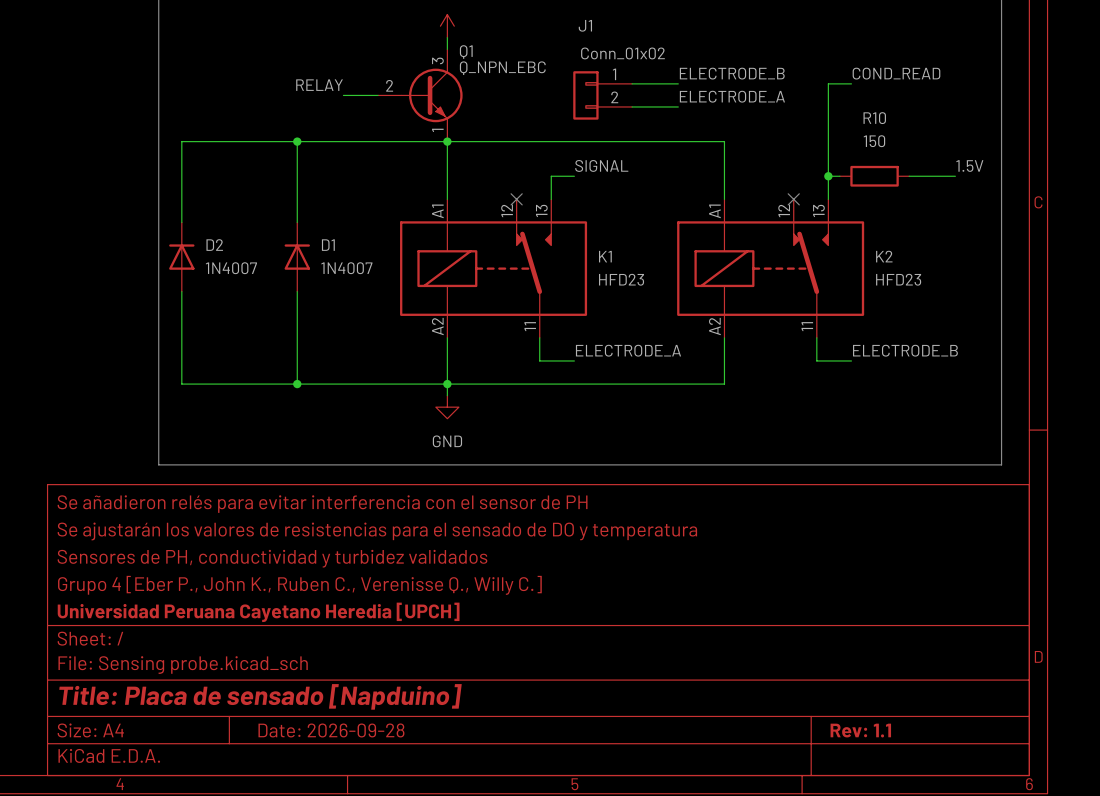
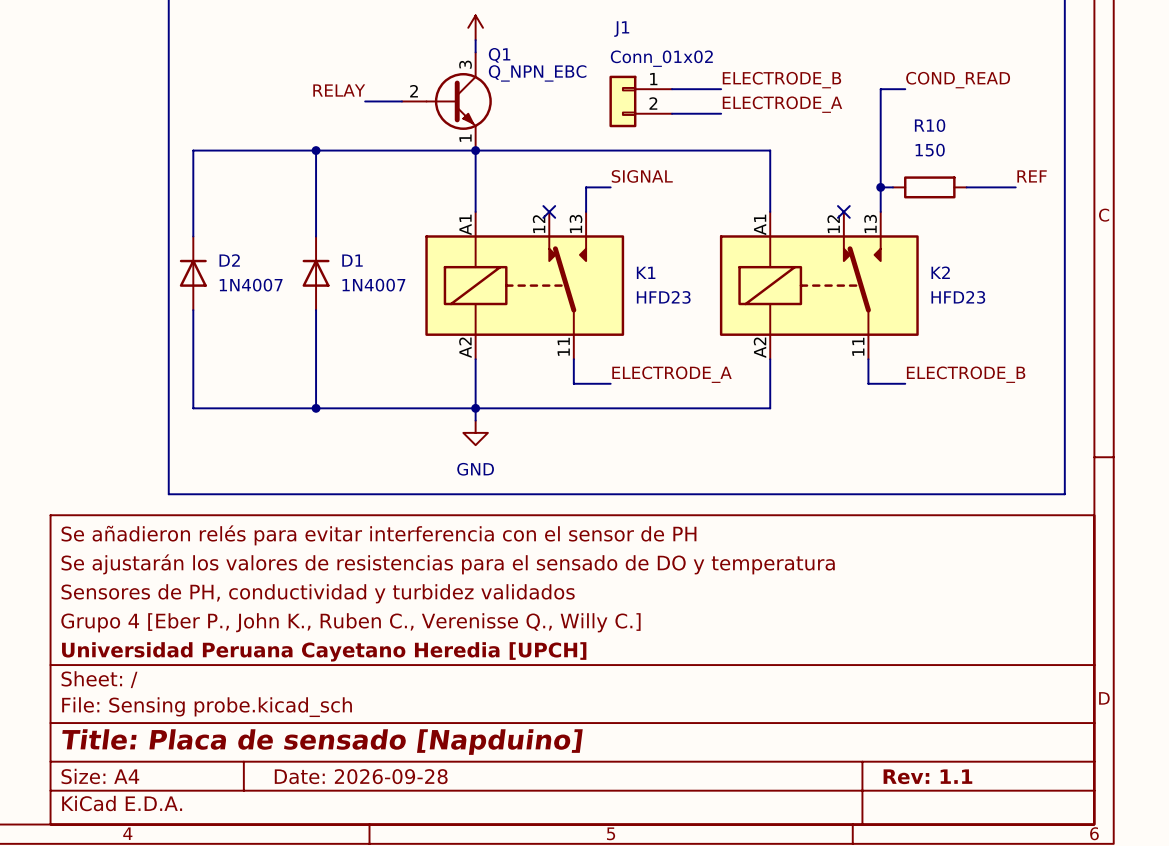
label: 1.5V (969, 166) -> REF (1032, 176)

